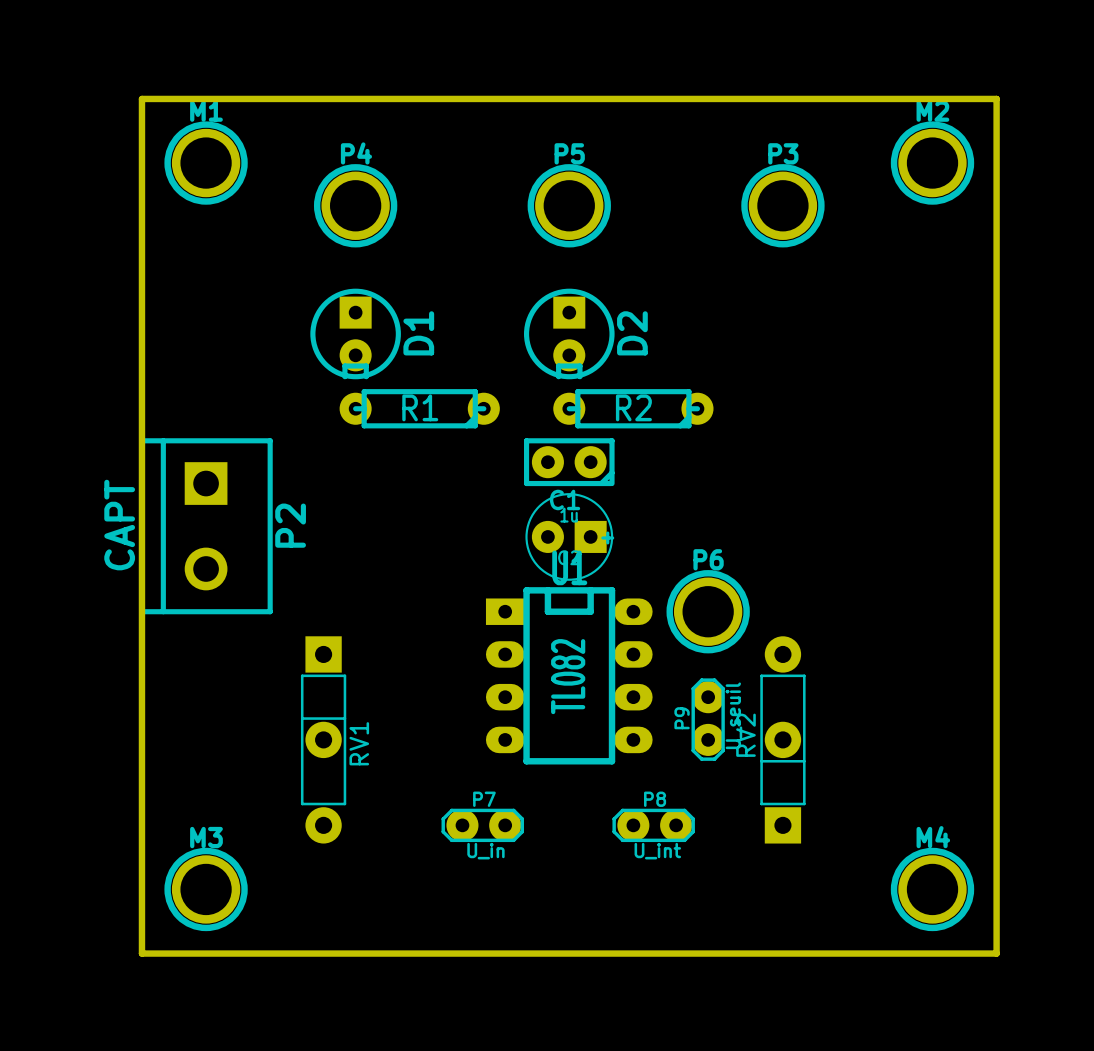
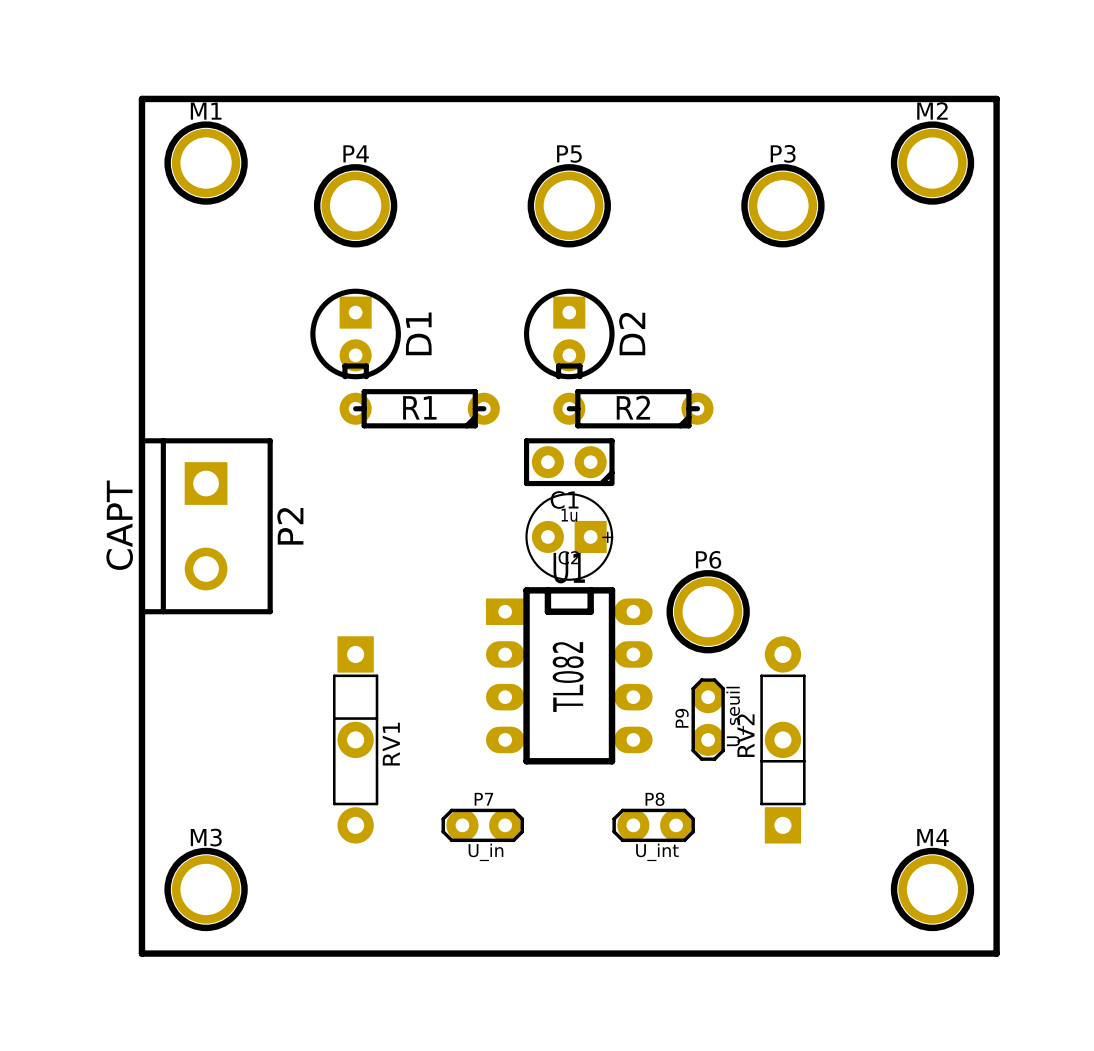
RV1 position: (323, 739) -> (355, 739)

